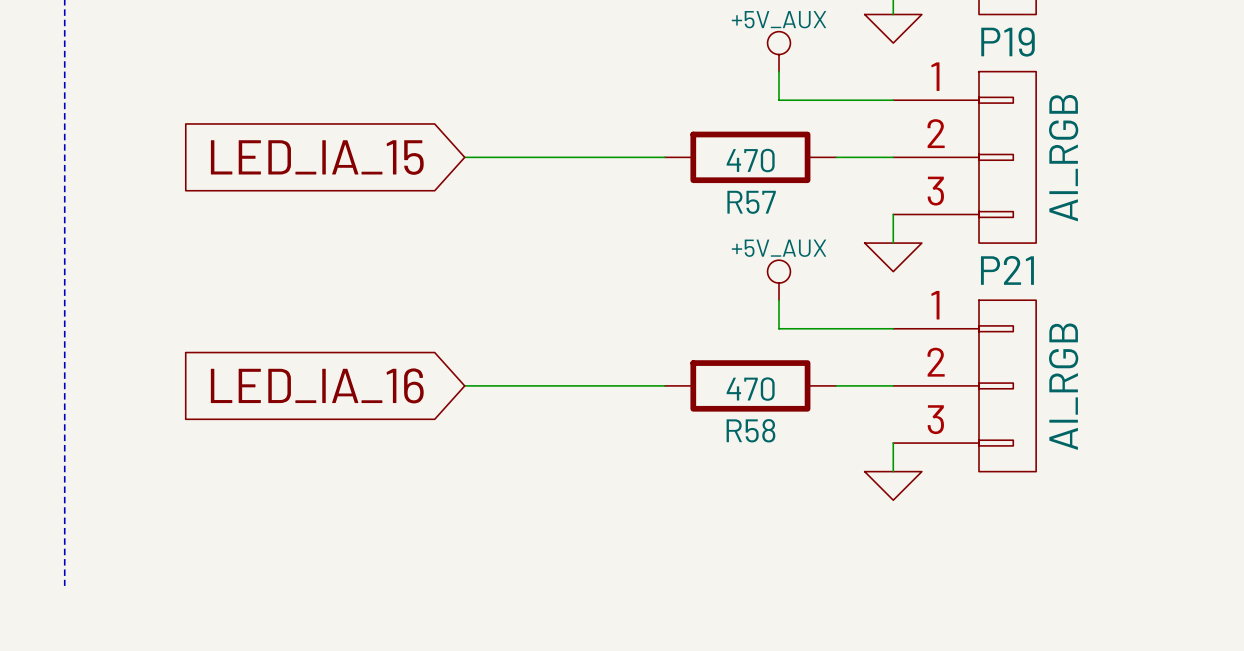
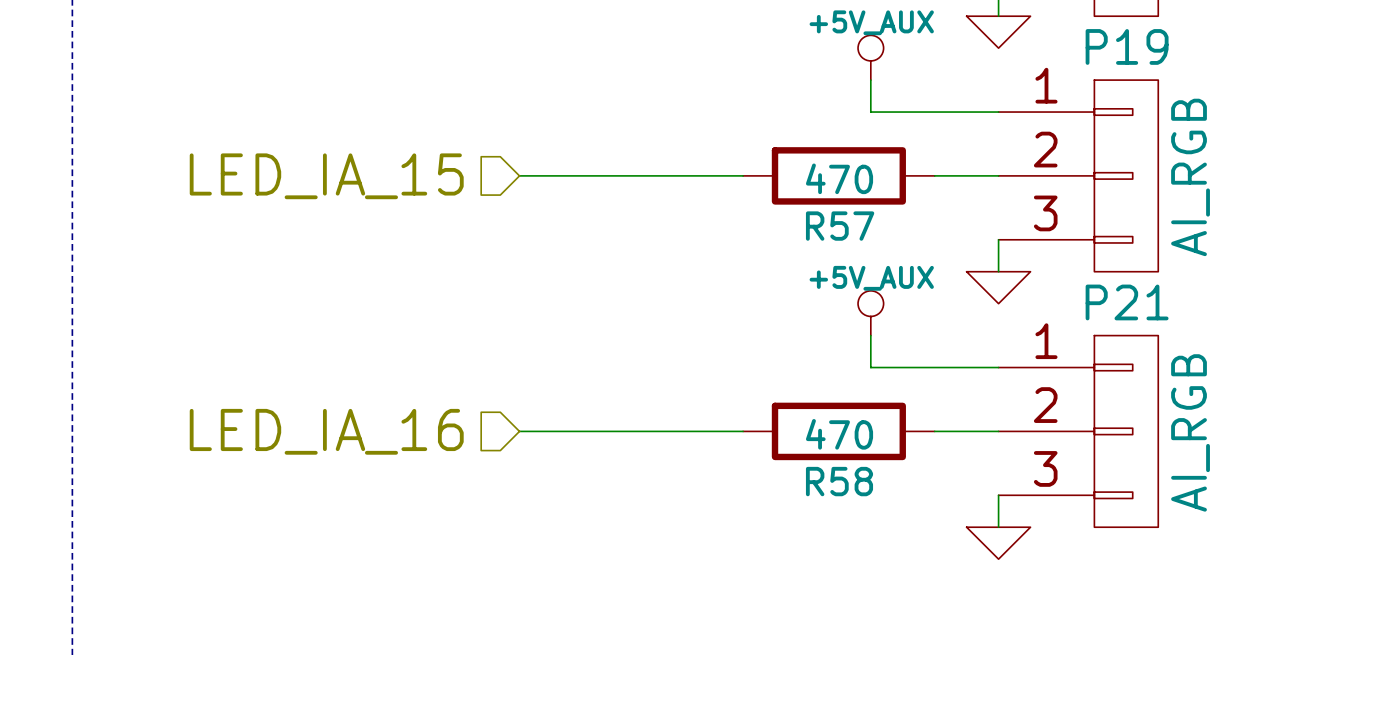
hierarchical label: none -> LED_IA_15 (326, 176)
global label: LED_IA_15 (317, 157) -> none
hierarchical label: none -> LED_IA_16 (326, 431)
global label: LED_IA_16 (317, 385) -> none

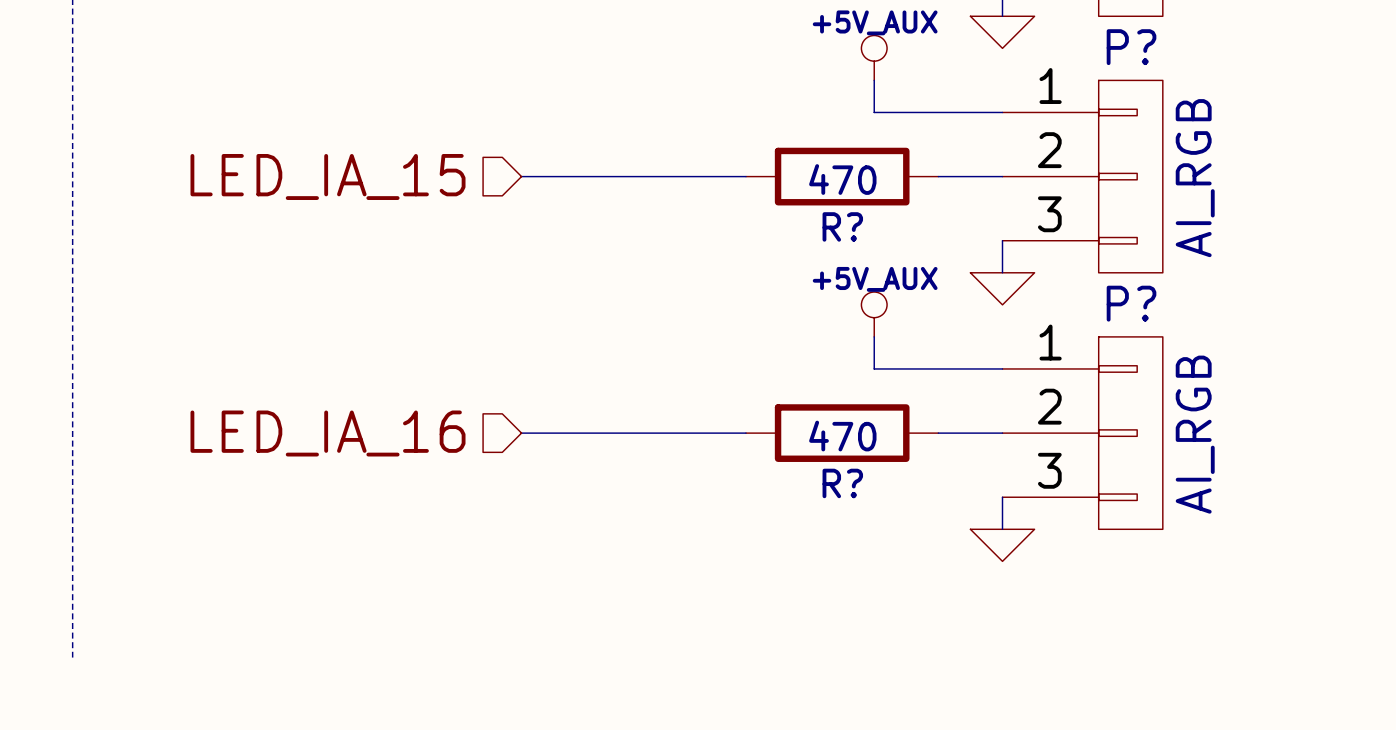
P19 name: P19 (1127, 46) -> P? (1131, 47)
R57 name: R57 (840, 226) -> R? (842, 226)
P21 name: P21 (1127, 302) -> P? (1131, 303)
R58 name: R58 (839, 481) -> R? (842, 483)

